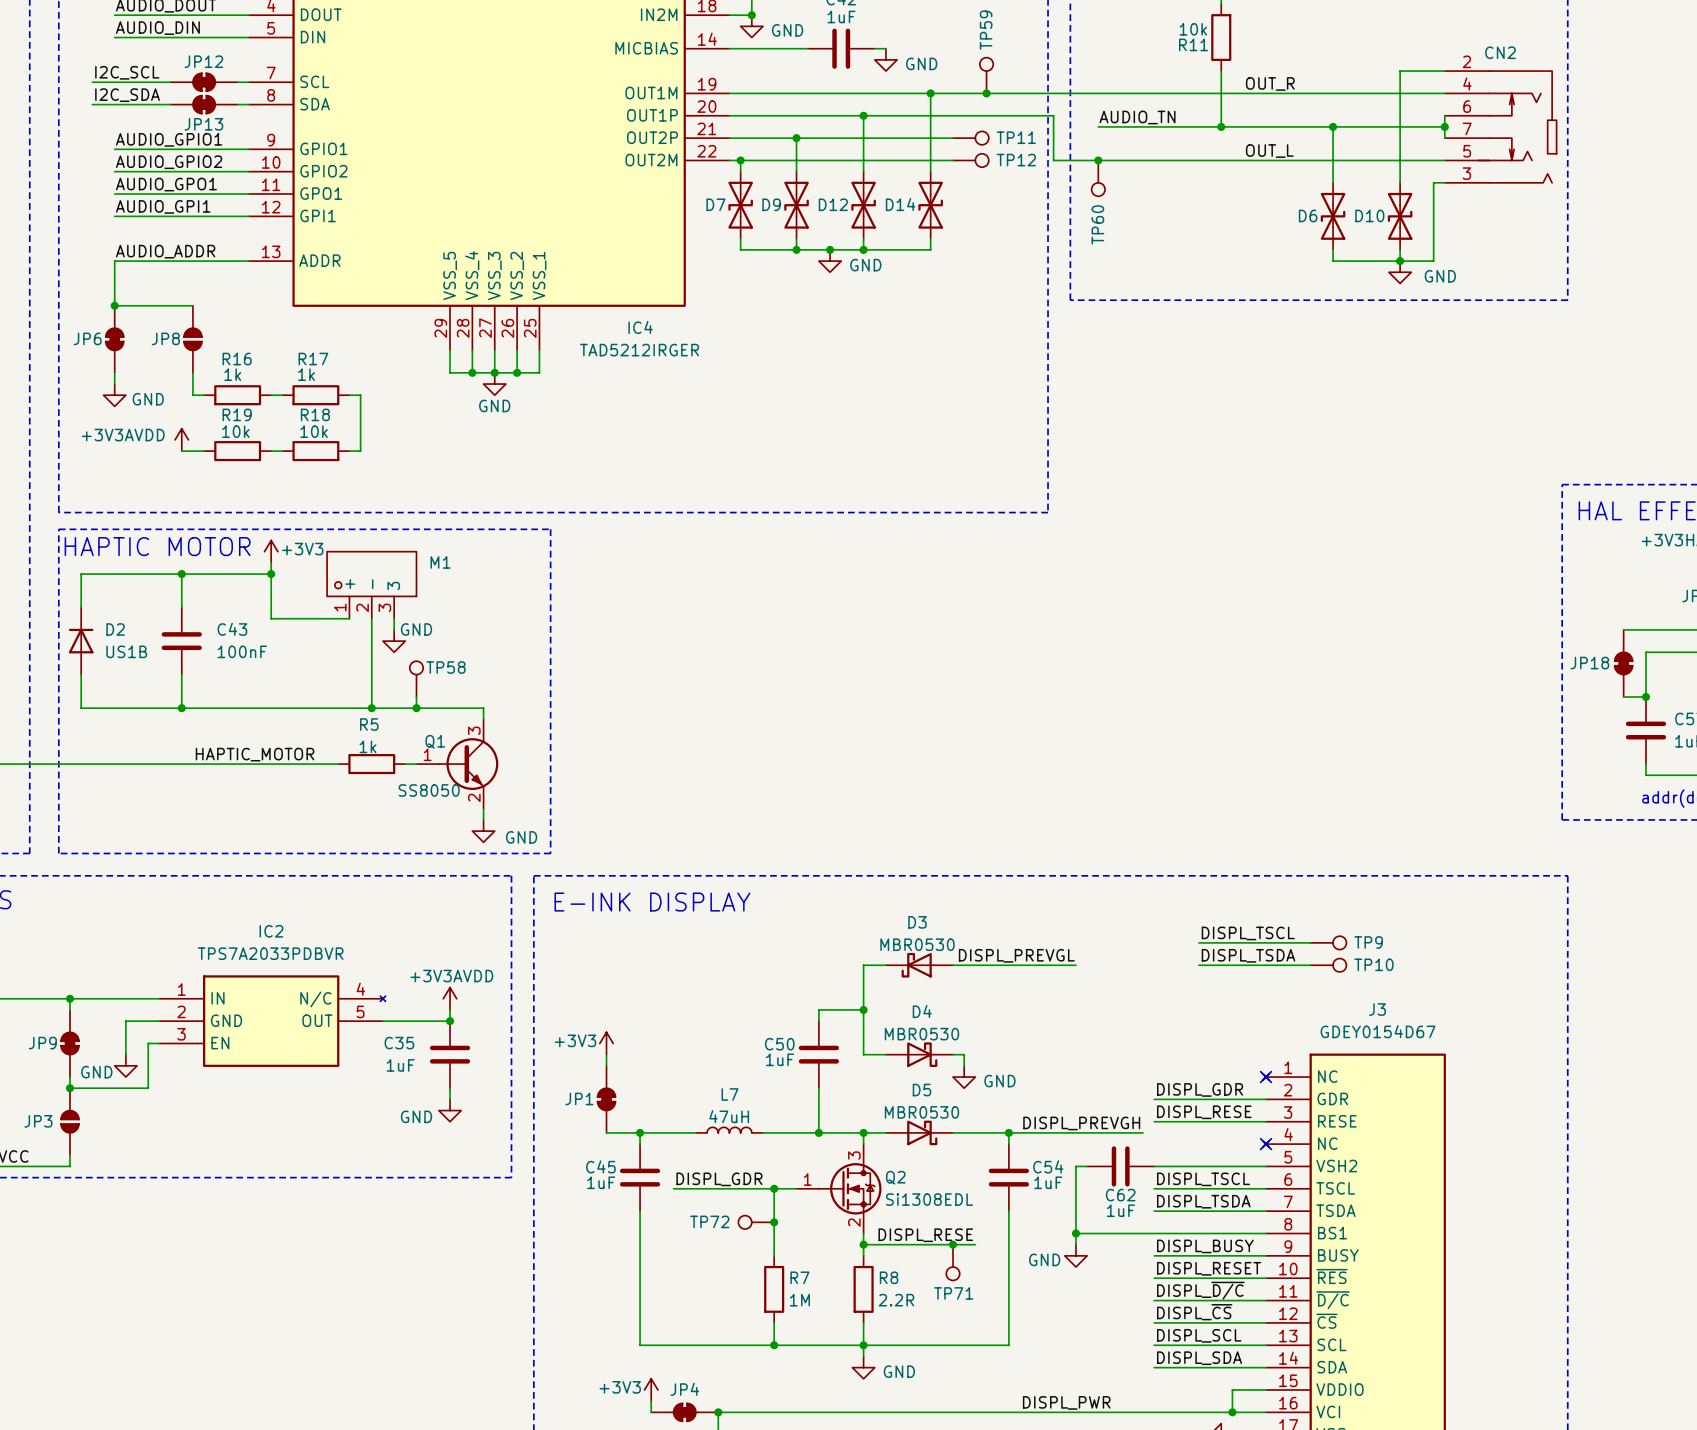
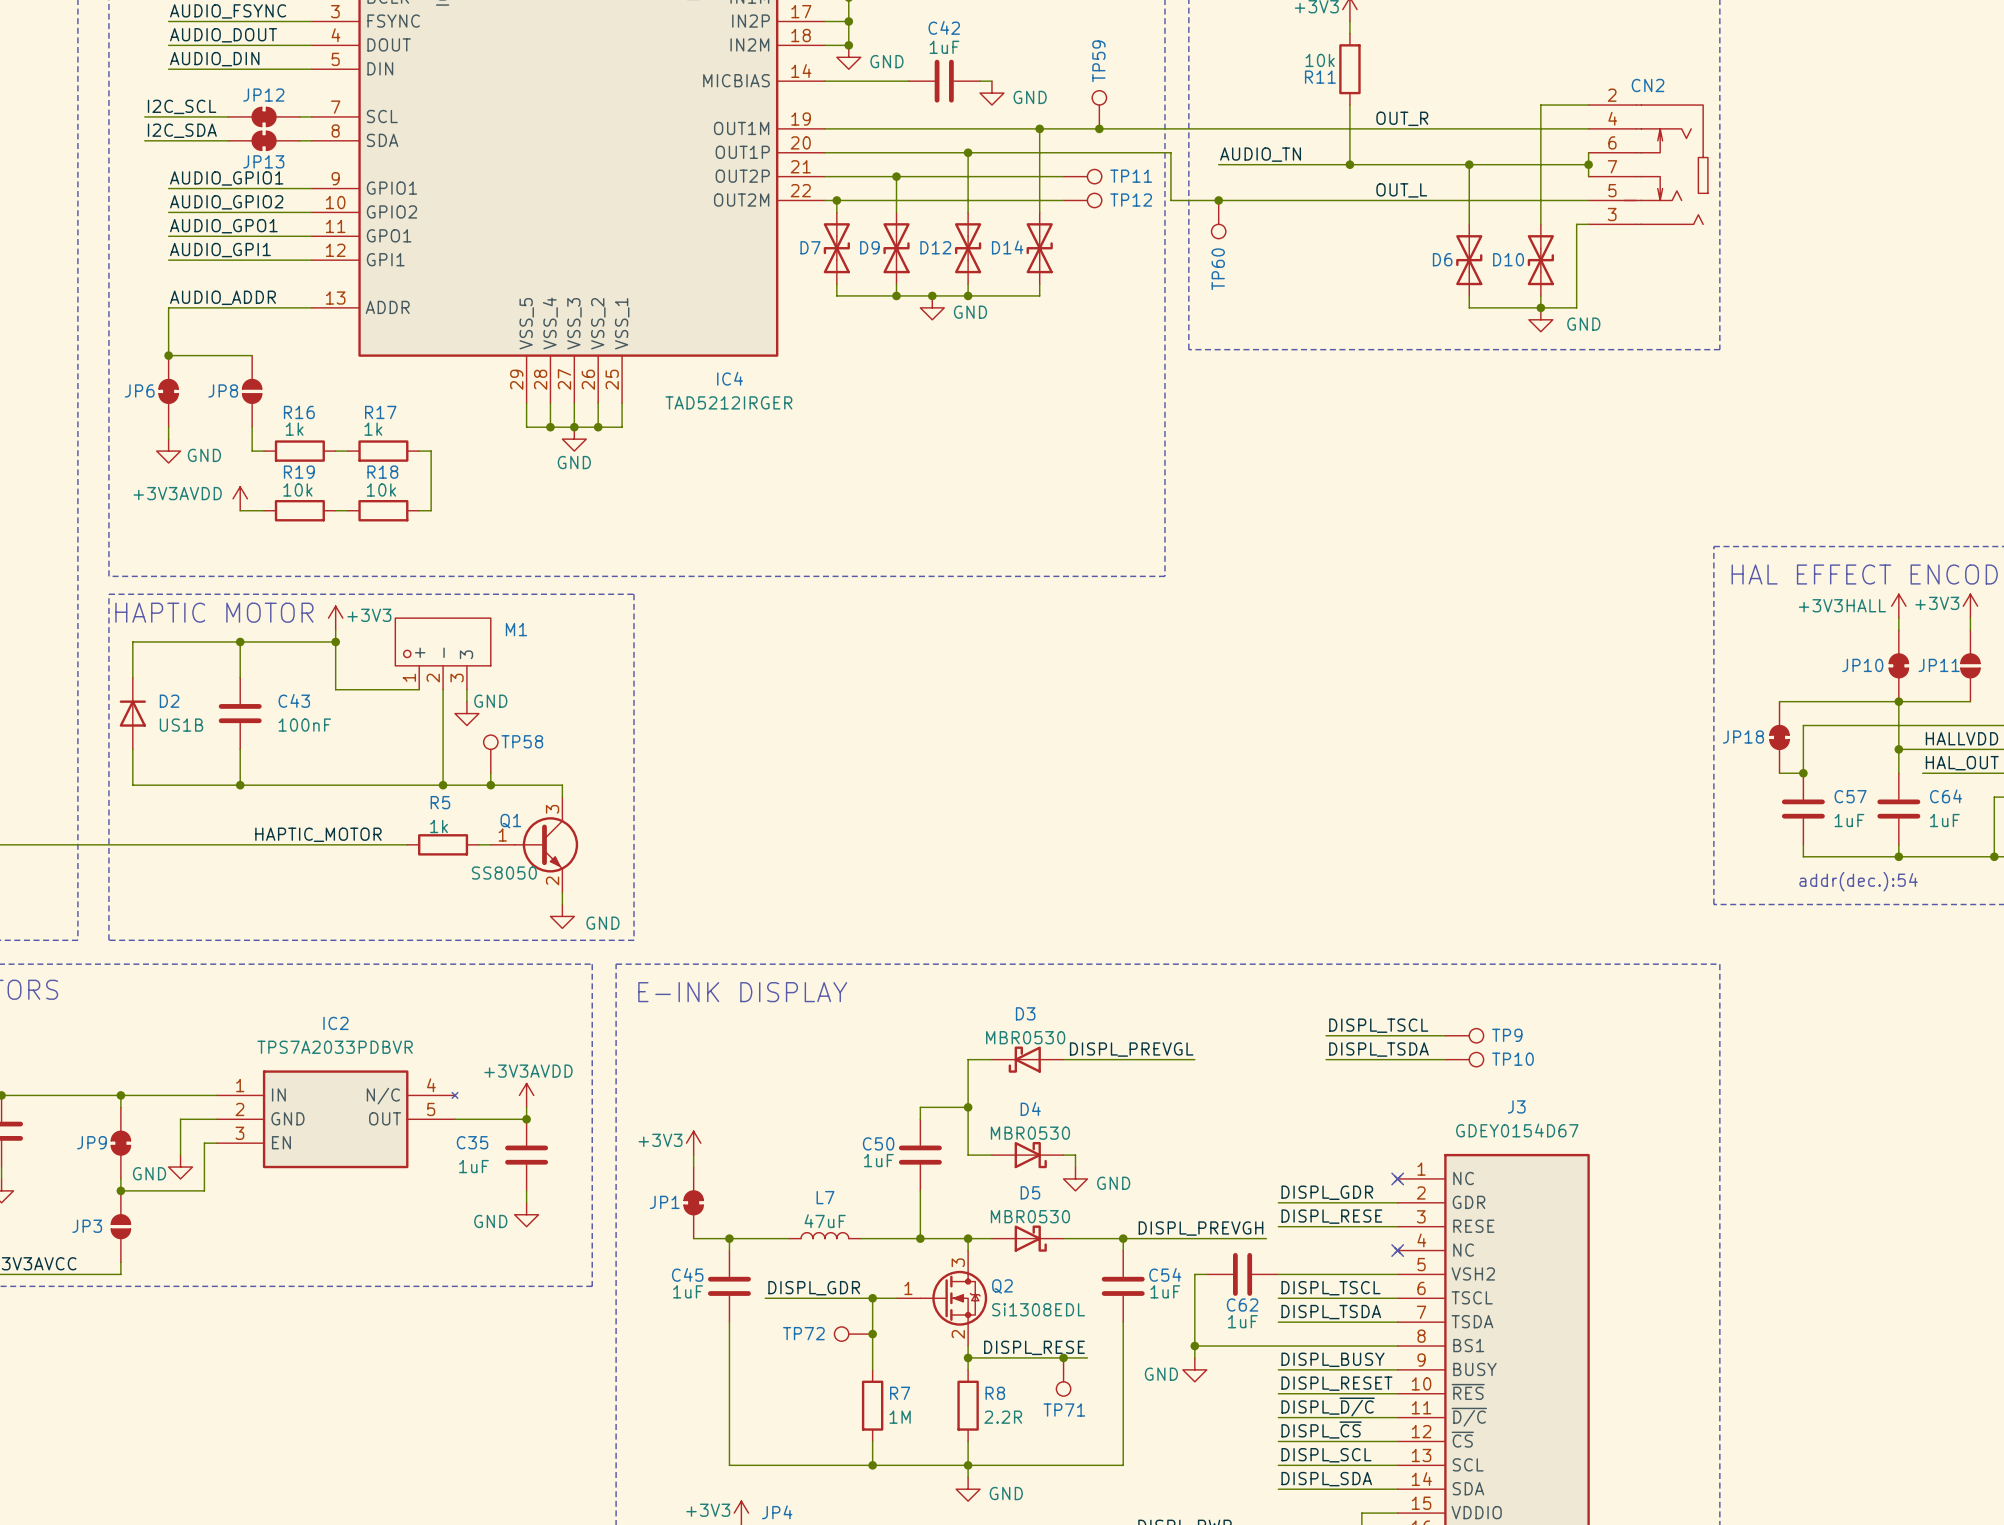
L7 value: 47uH (729, 1116) -> 47uF (825, 1221)

